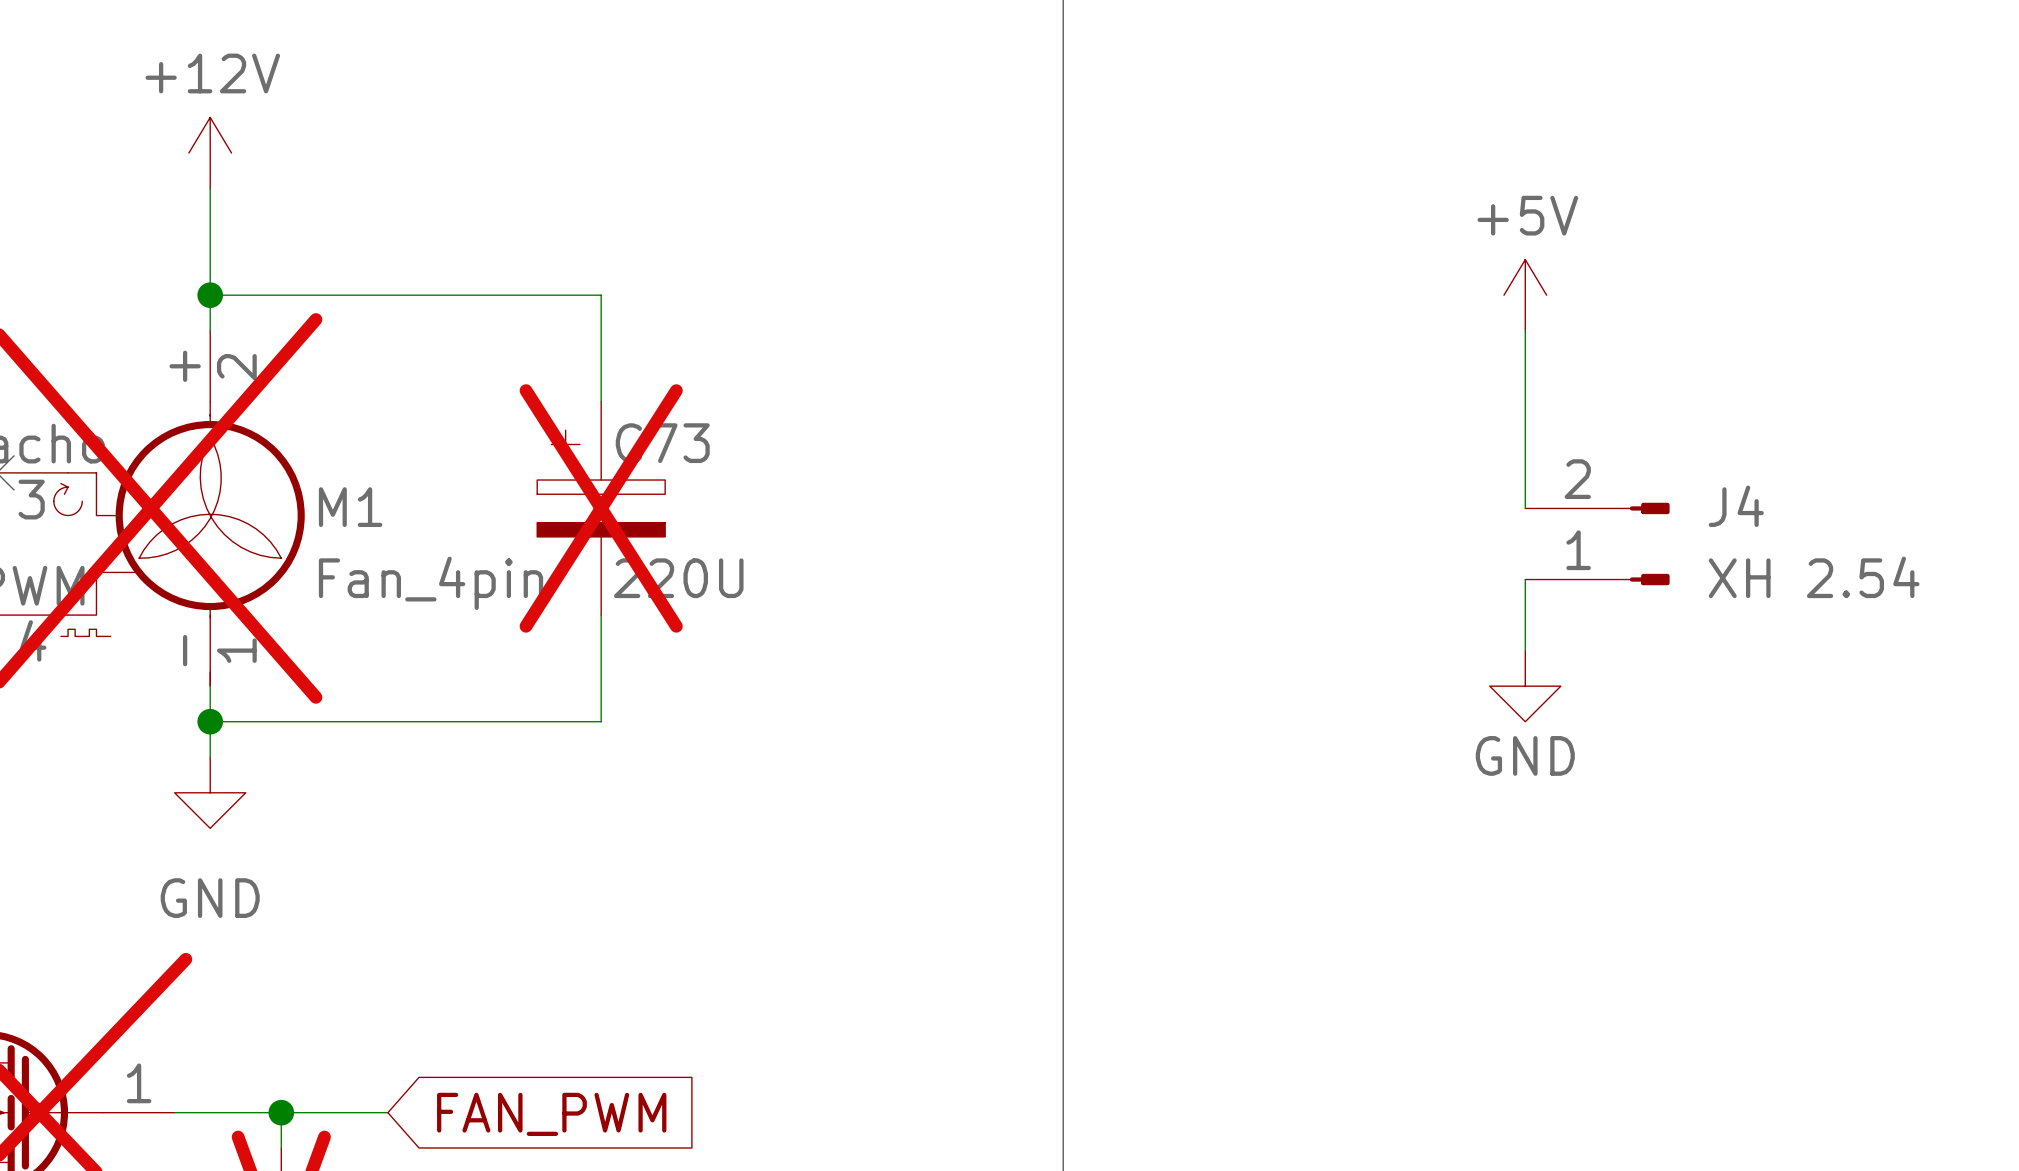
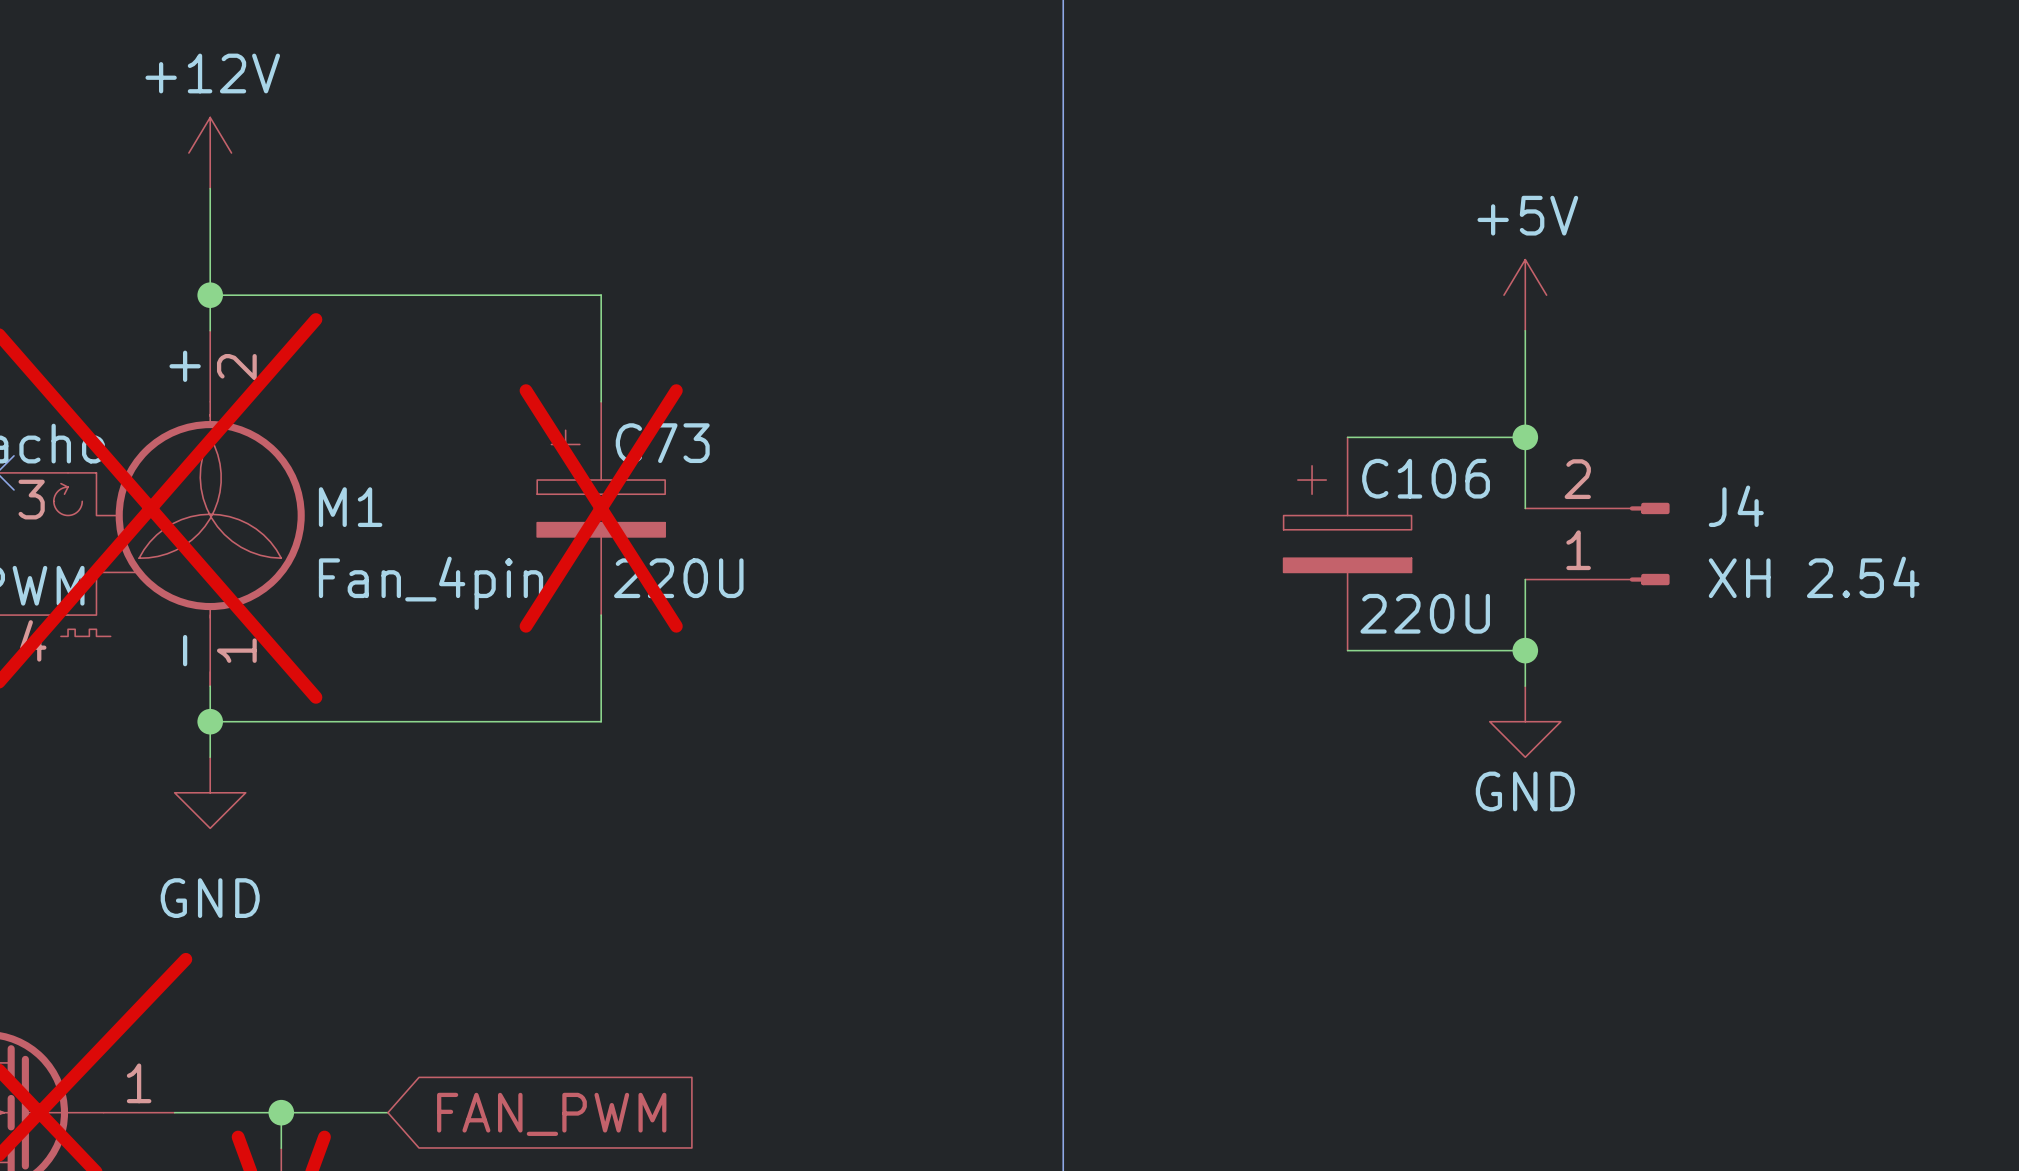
wire: none -> (1347, 437) (1525, 437)
junction: none -> (1525, 437)
C106: none -> 220U (1347, 543)
wire: none -> (1347, 650) (1525, 650) (1525, 686)
junction: none -> (1525, 650)
power symbol position: GND (1525, 686) -> GND (1525, 721)

